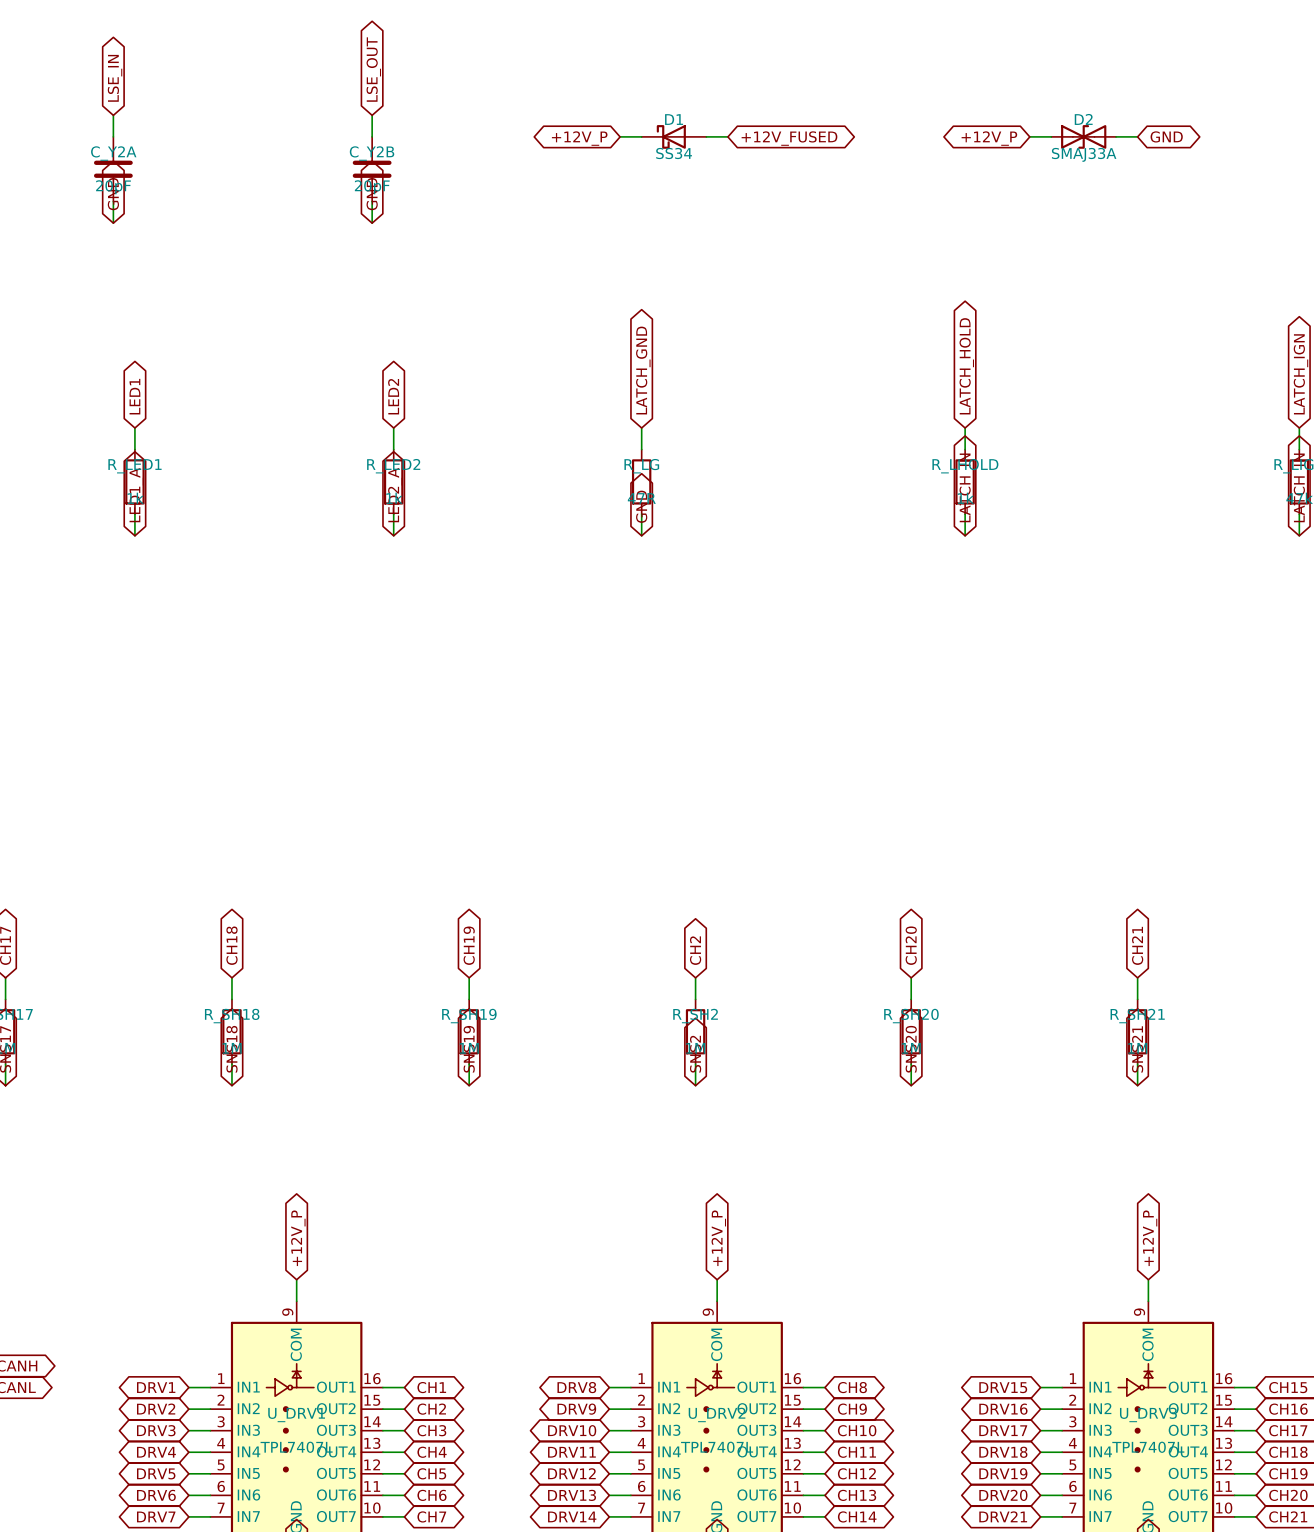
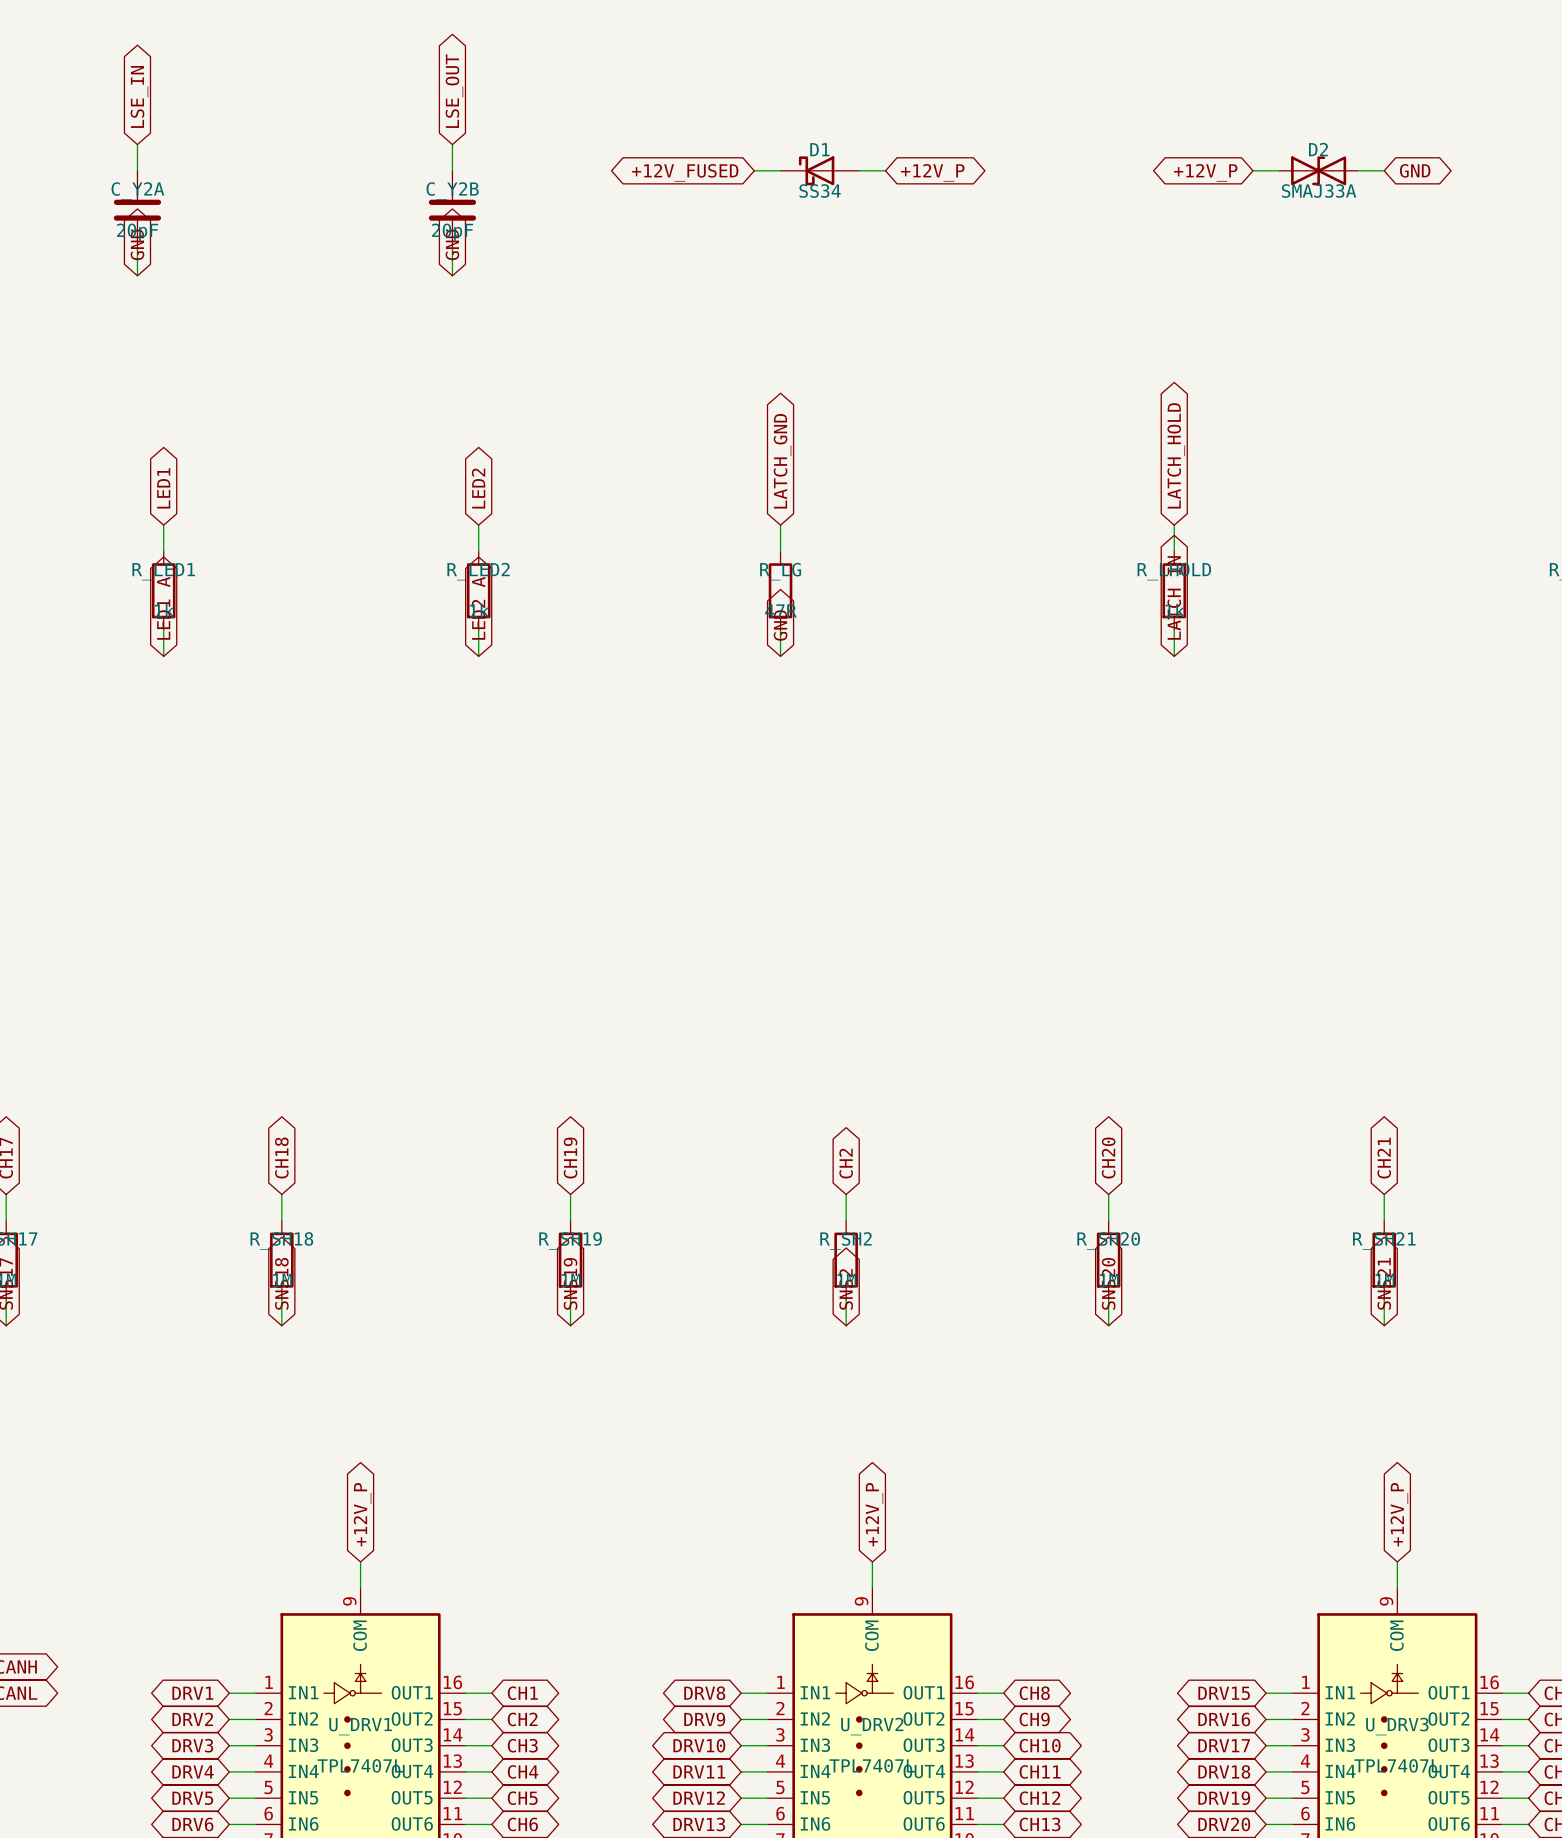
global label: +12V_P (579, 138) -> +12V_FUSED (685, 172)
global label: +12V_FUSED (789, 138) -> +12V_P (932, 172)

